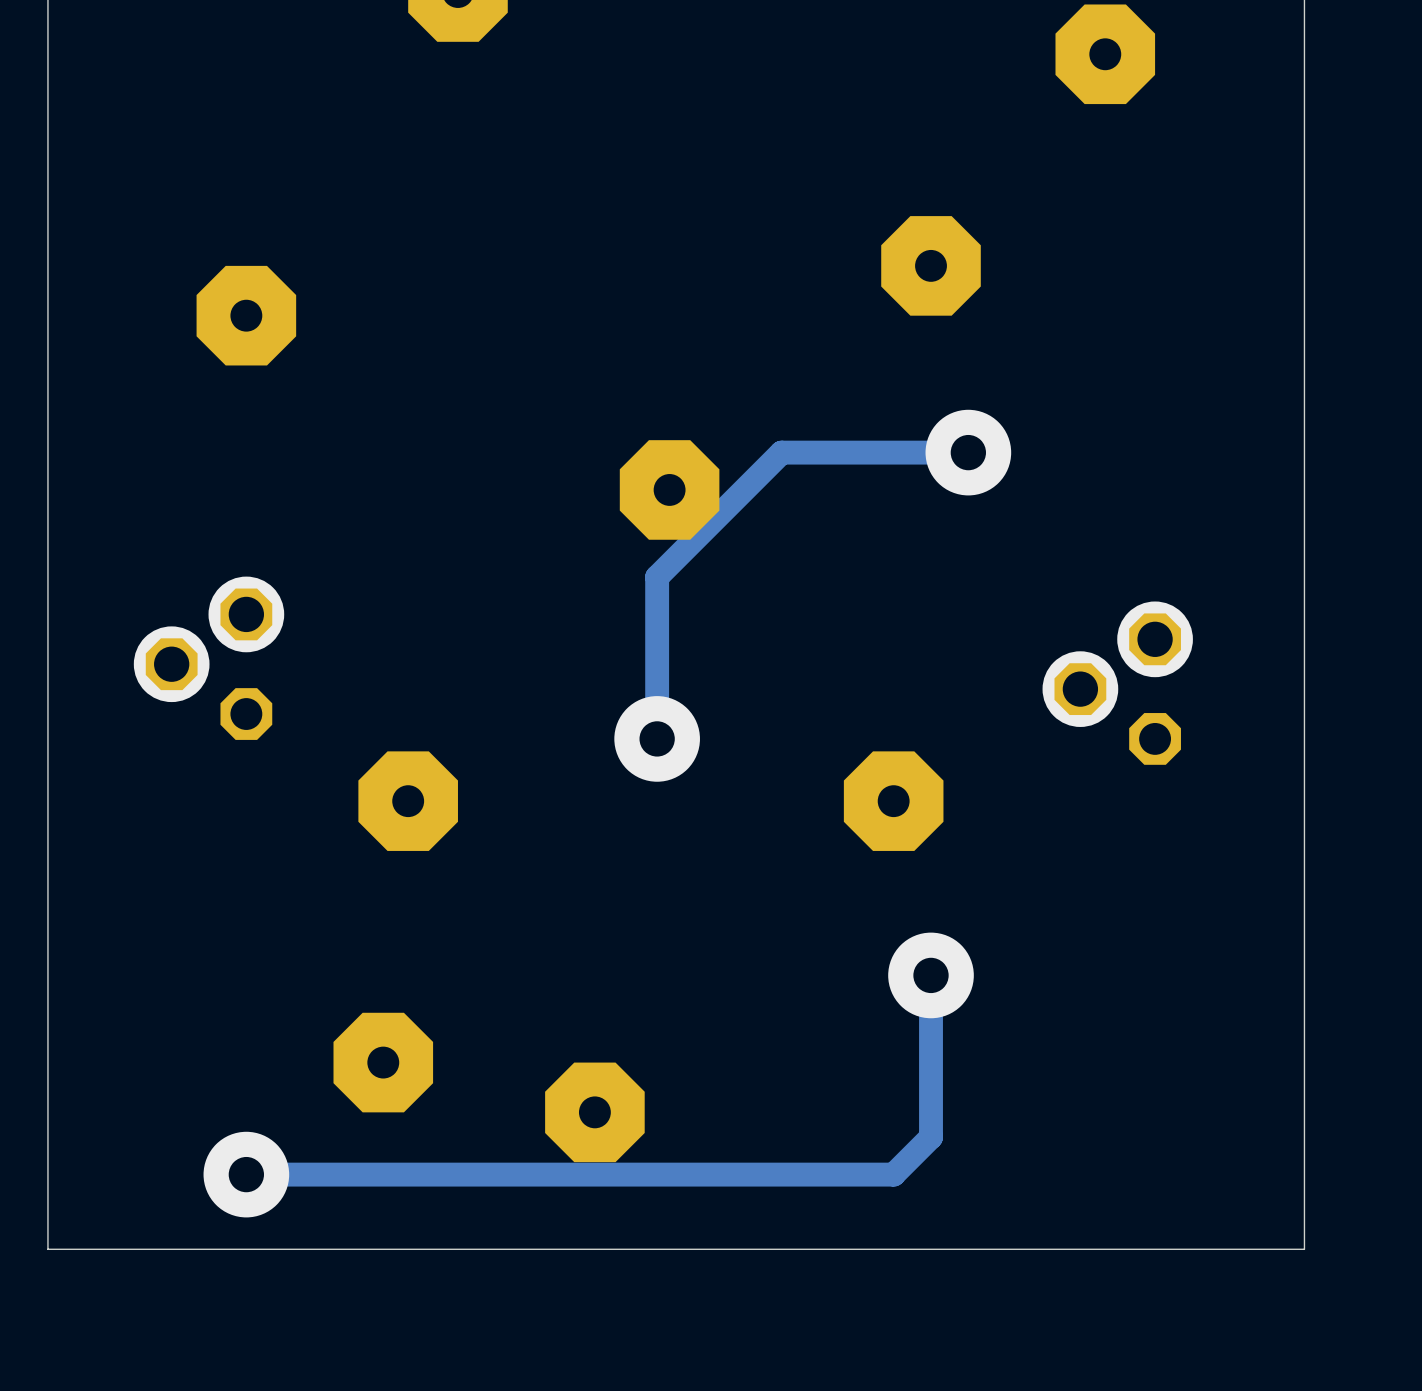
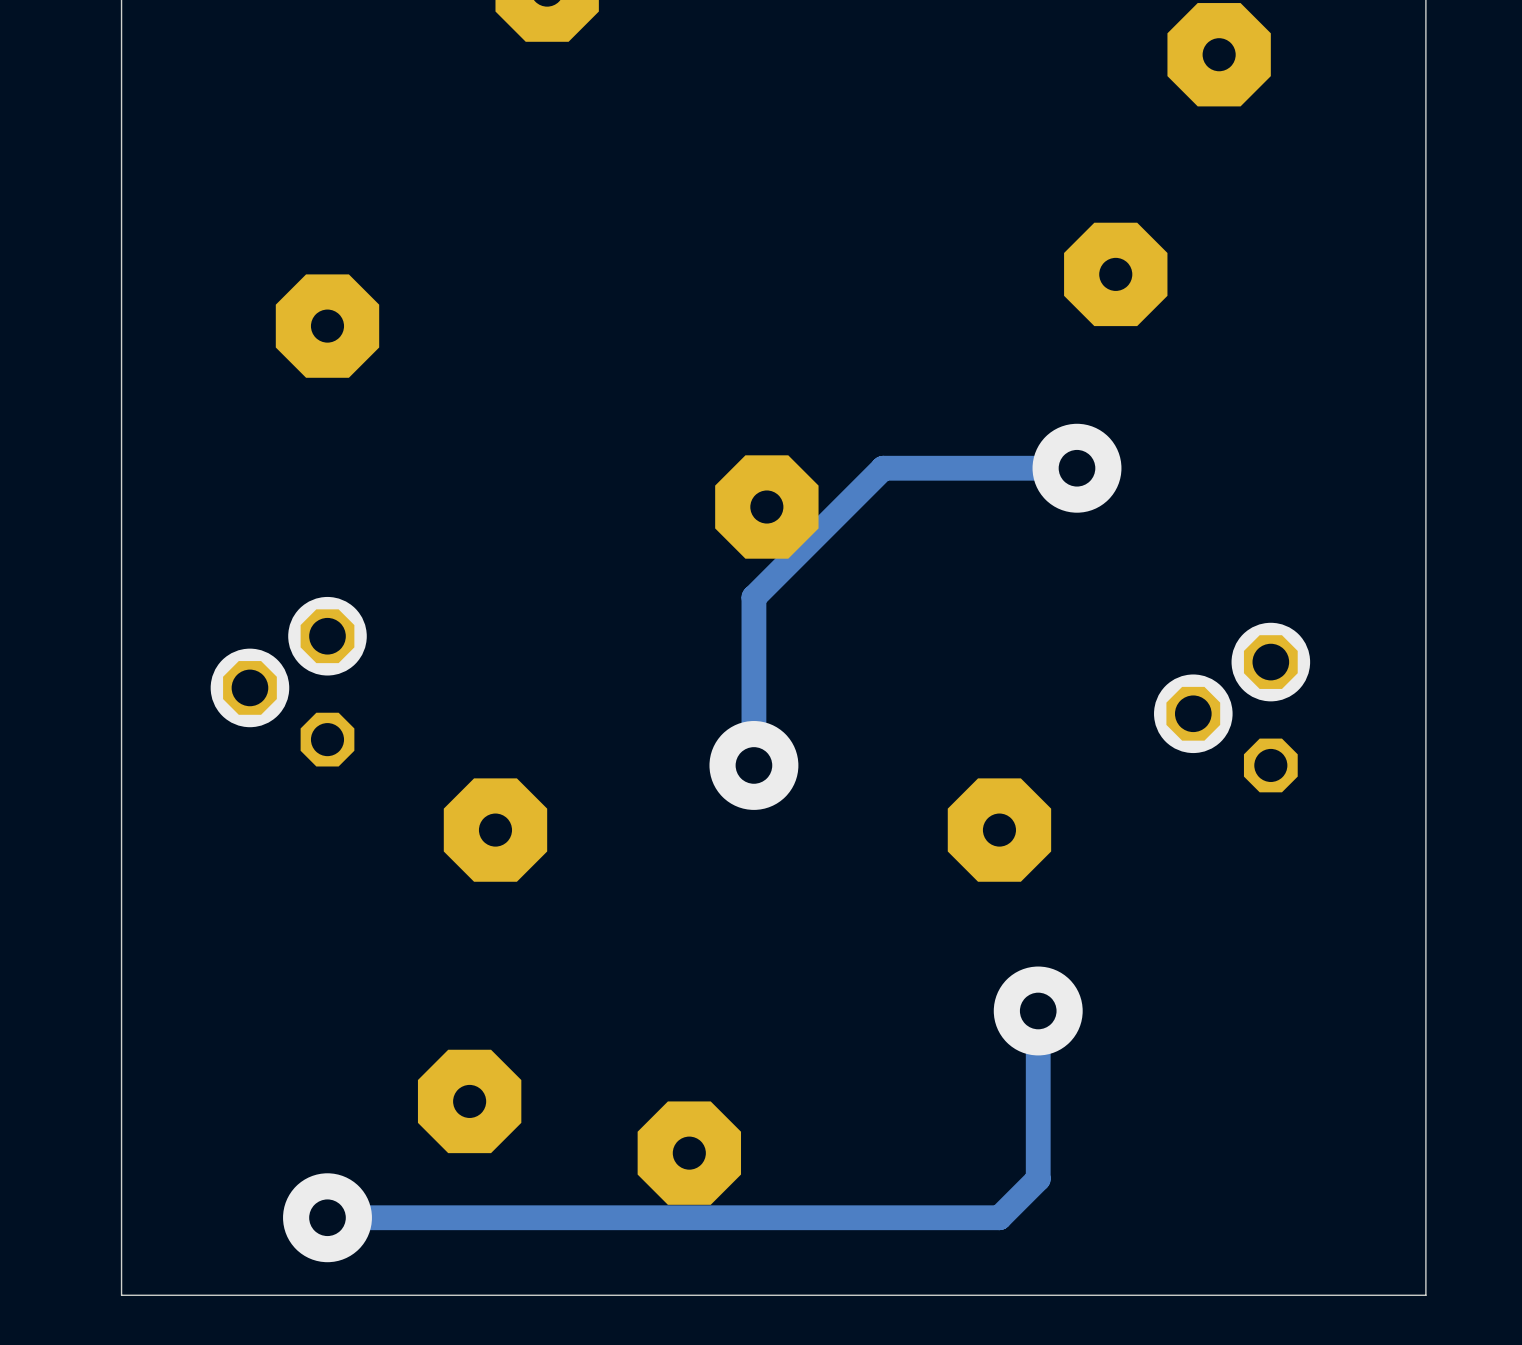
part position: (931, 265) -> (1115, 274)

